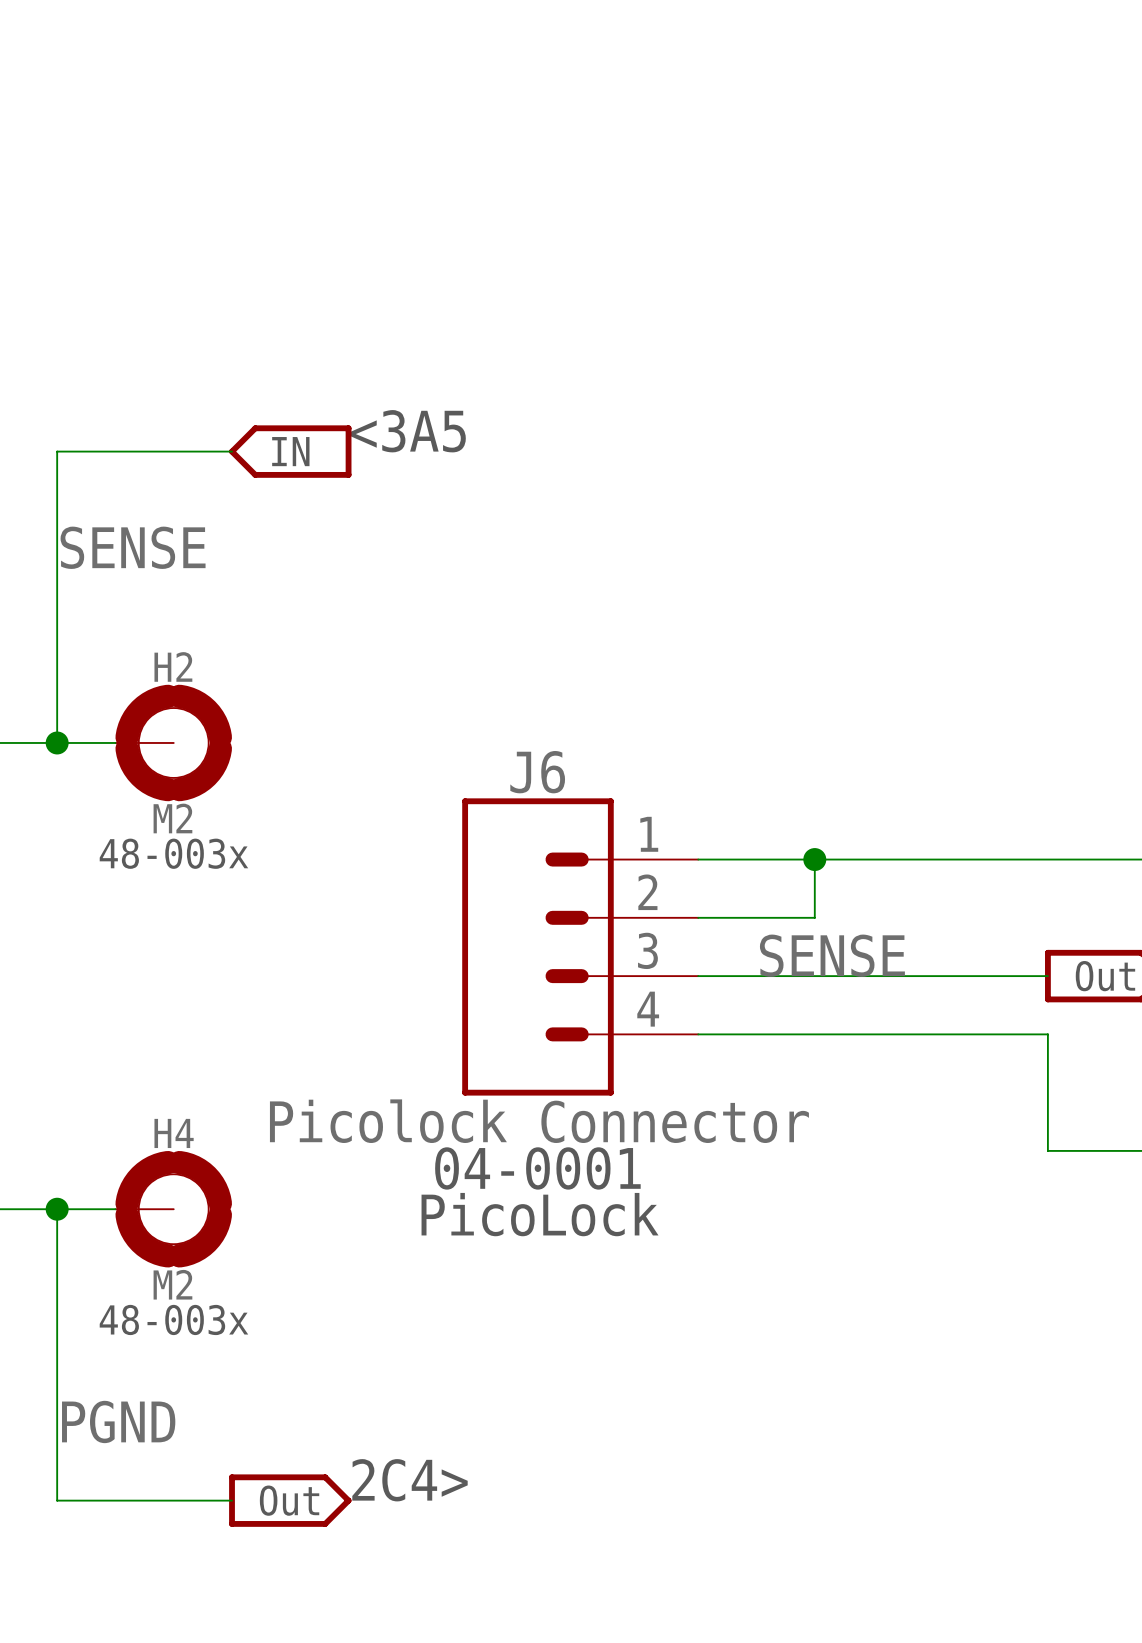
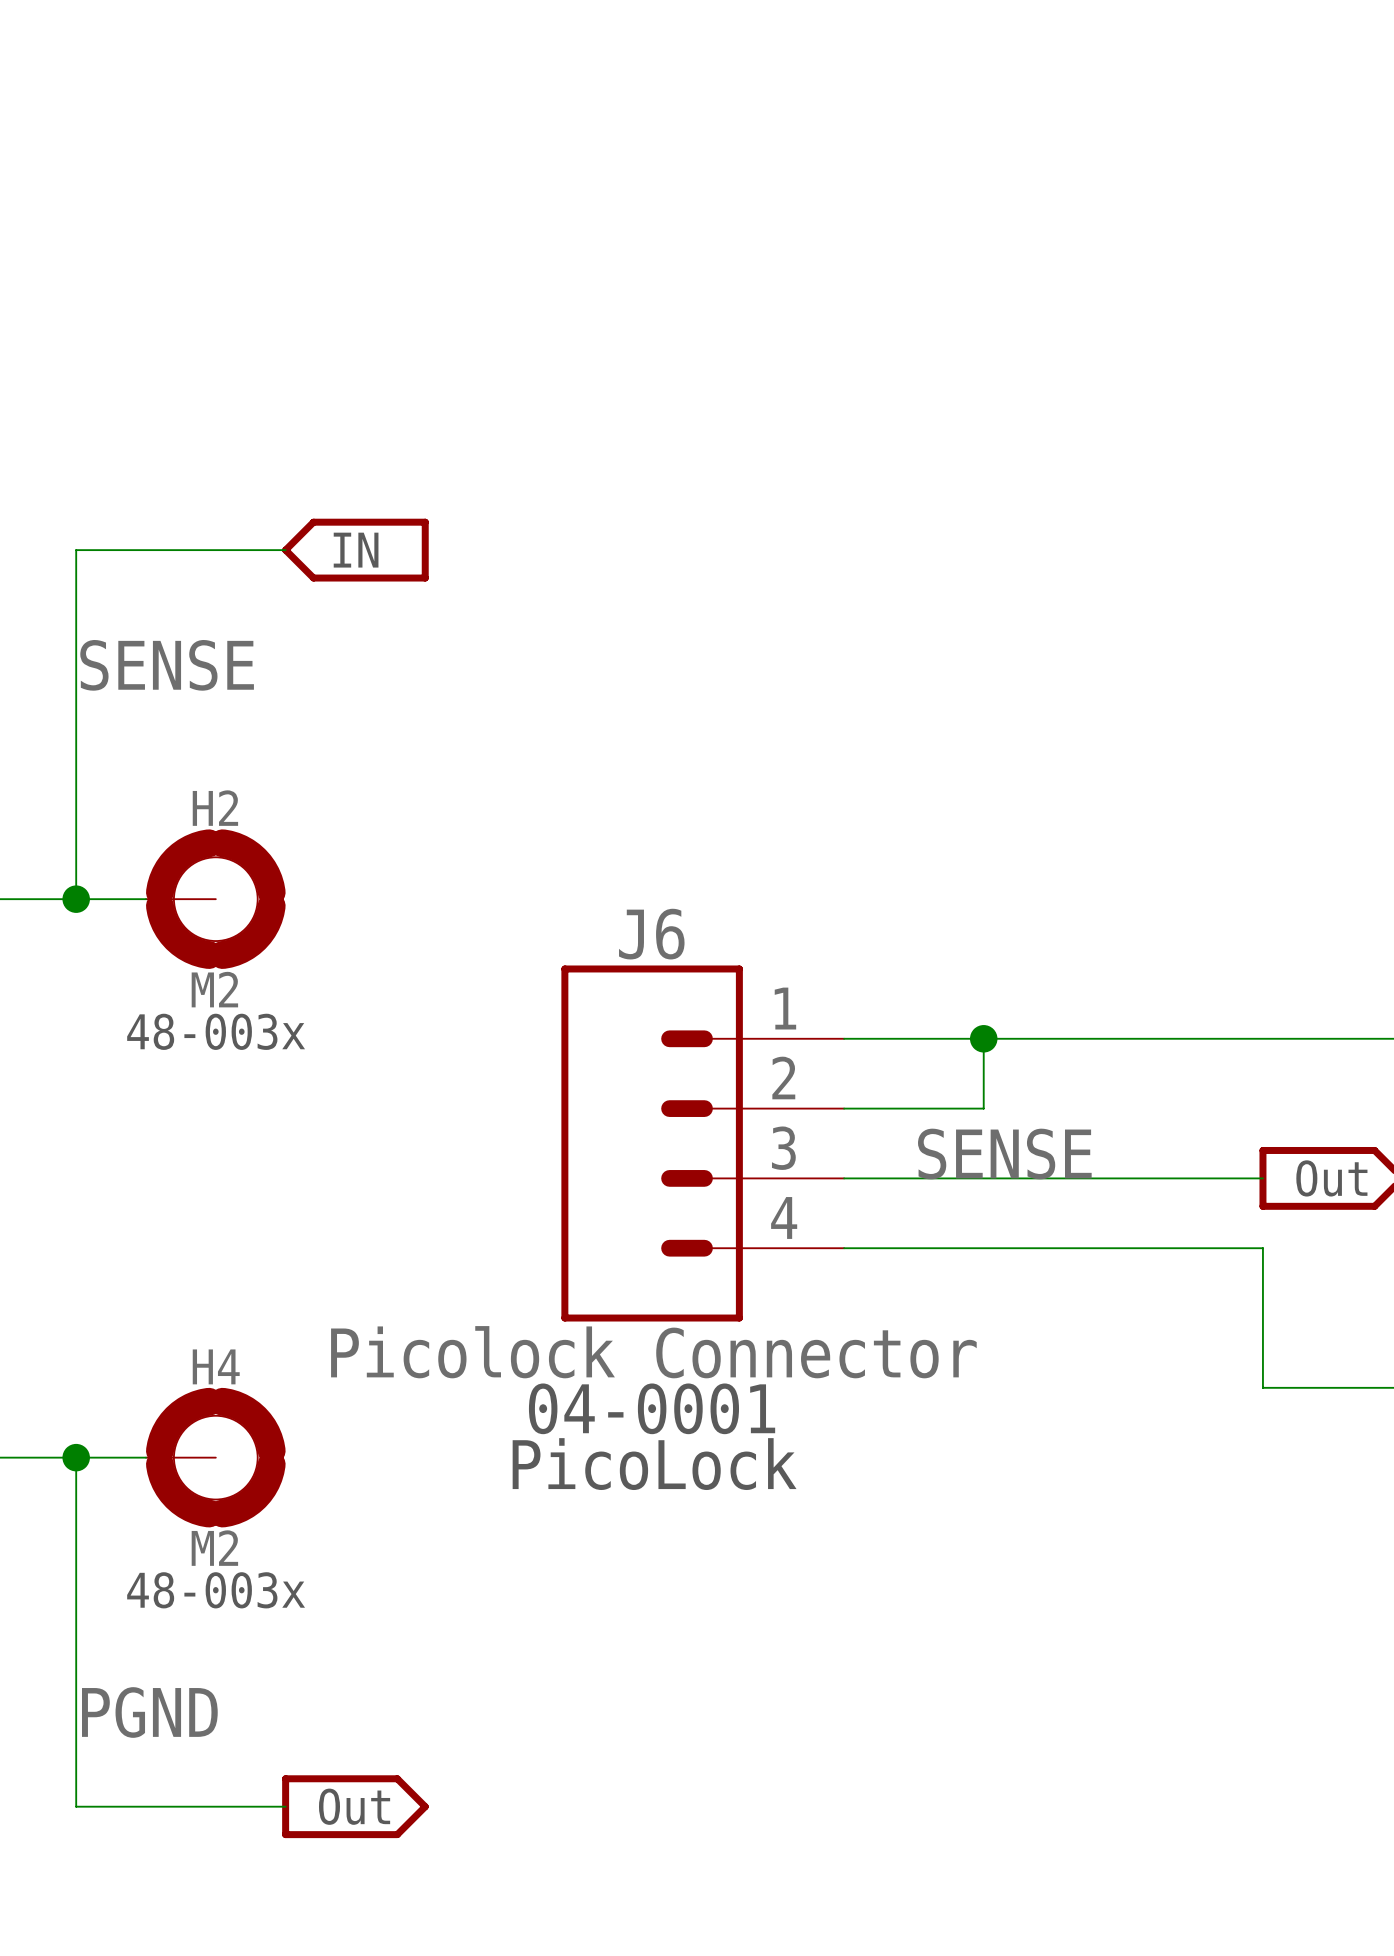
text: <3A5 (408, 431) -> none
text: 2C4> (409, 1480) -> none

